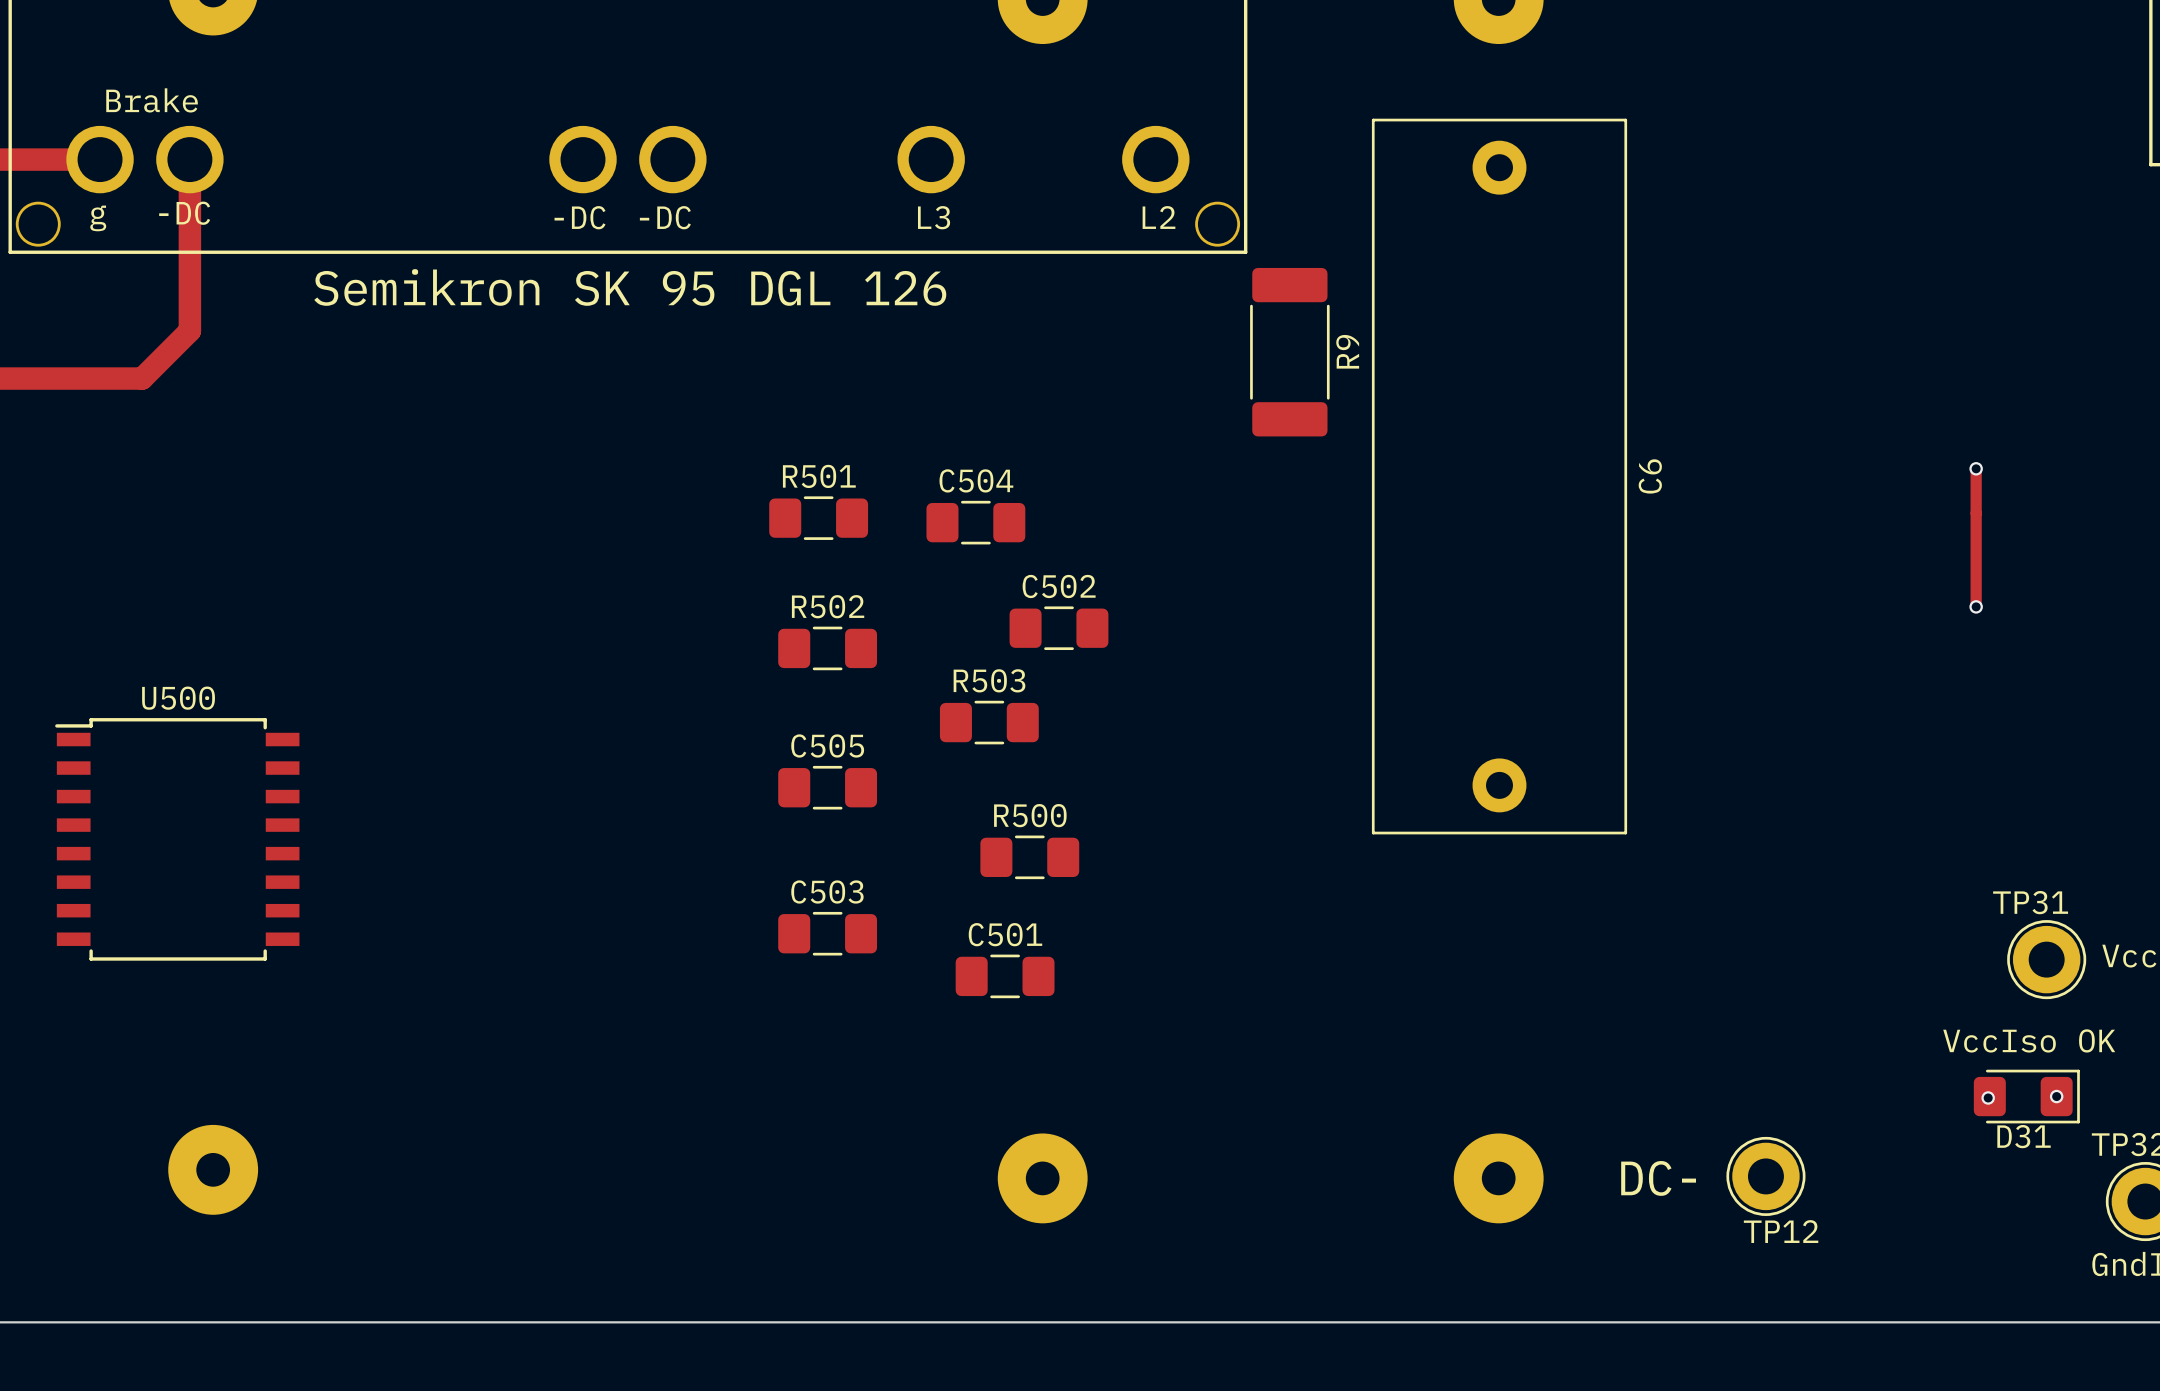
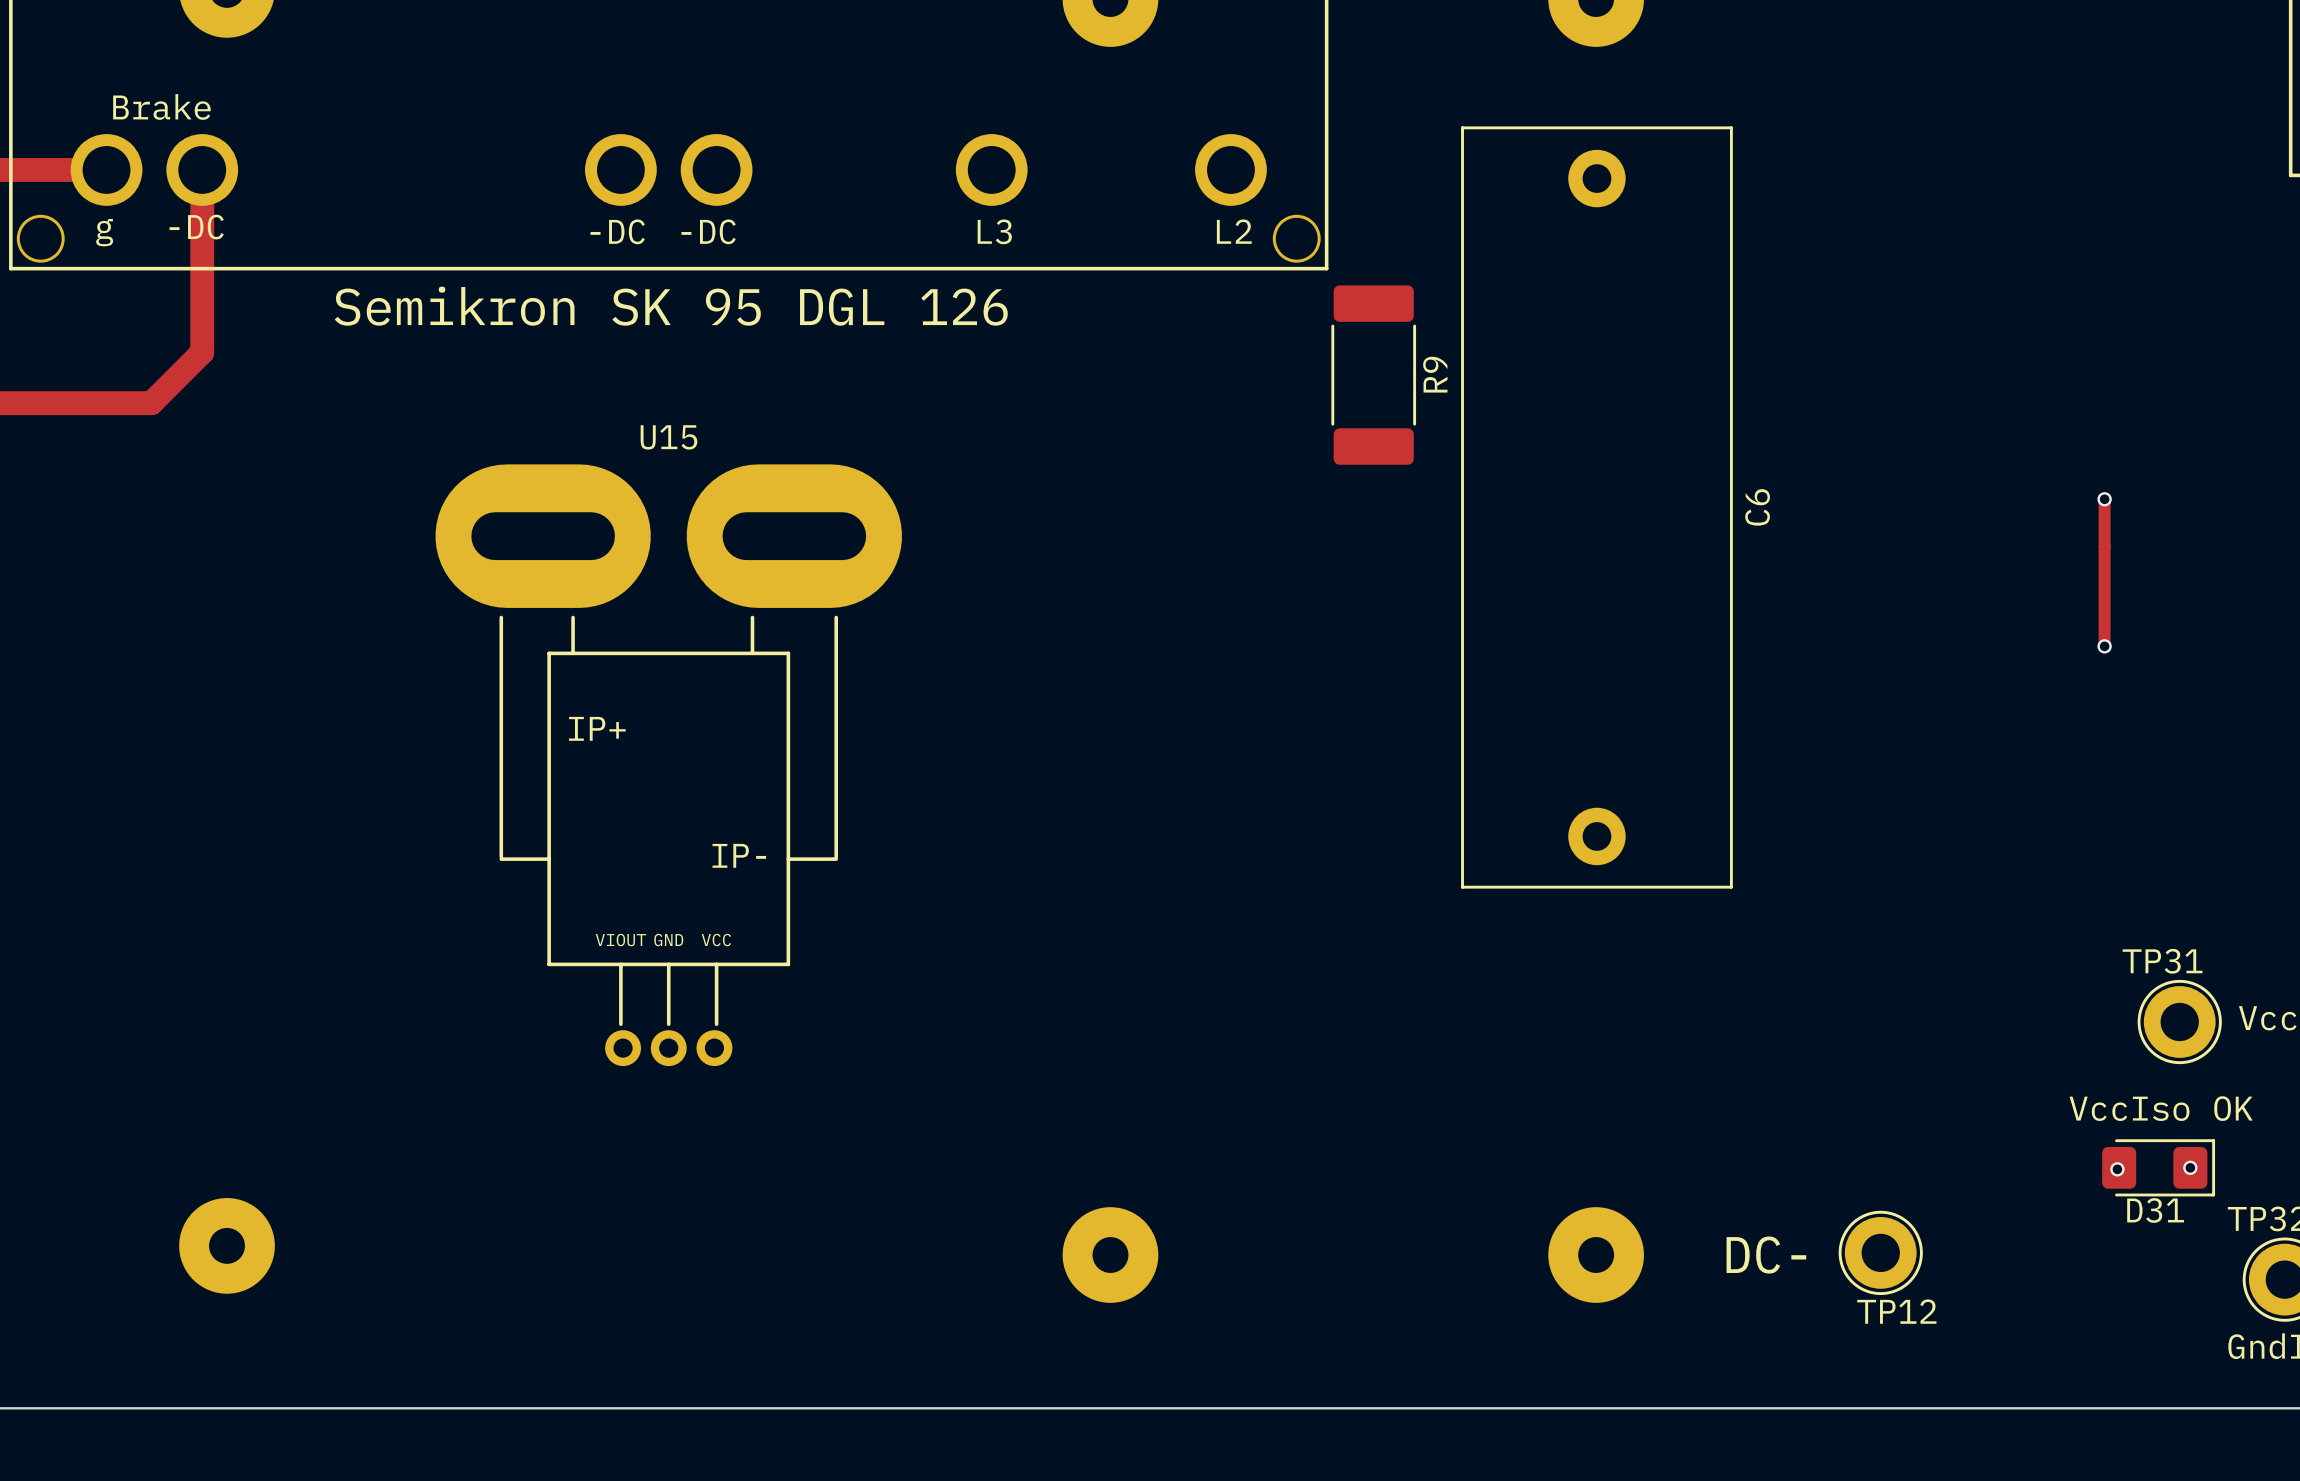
R501: (818, 518) -> none
C504: (975, 522) -> none
C502: (1059, 628) -> none
R502: (827, 648) -> none
U15: none -> (668, 765)
R503: (989, 722) -> none
C505: (827, 787) -> none
U500: (177, 839) -> none
R500: (1029, 857) -> none
C503: (827, 933) -> none
C501: (1005, 976) -> none

